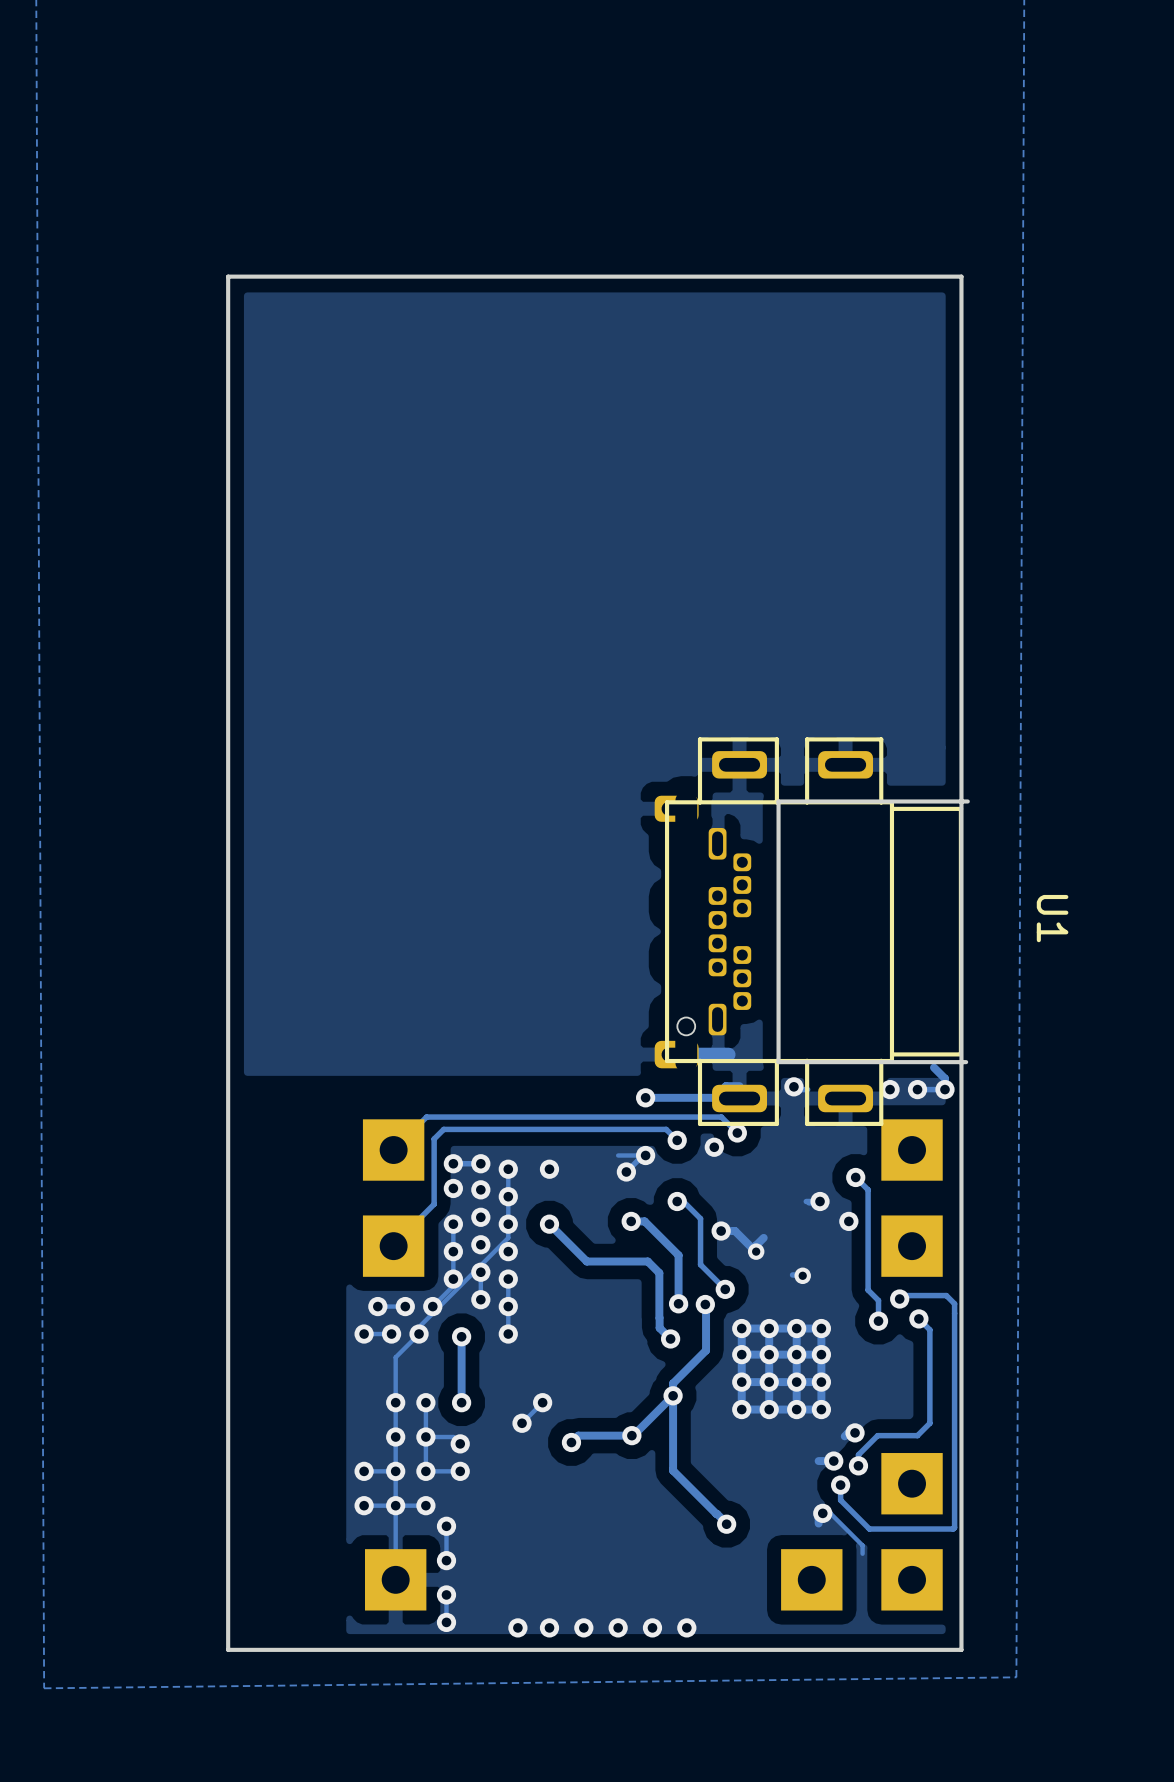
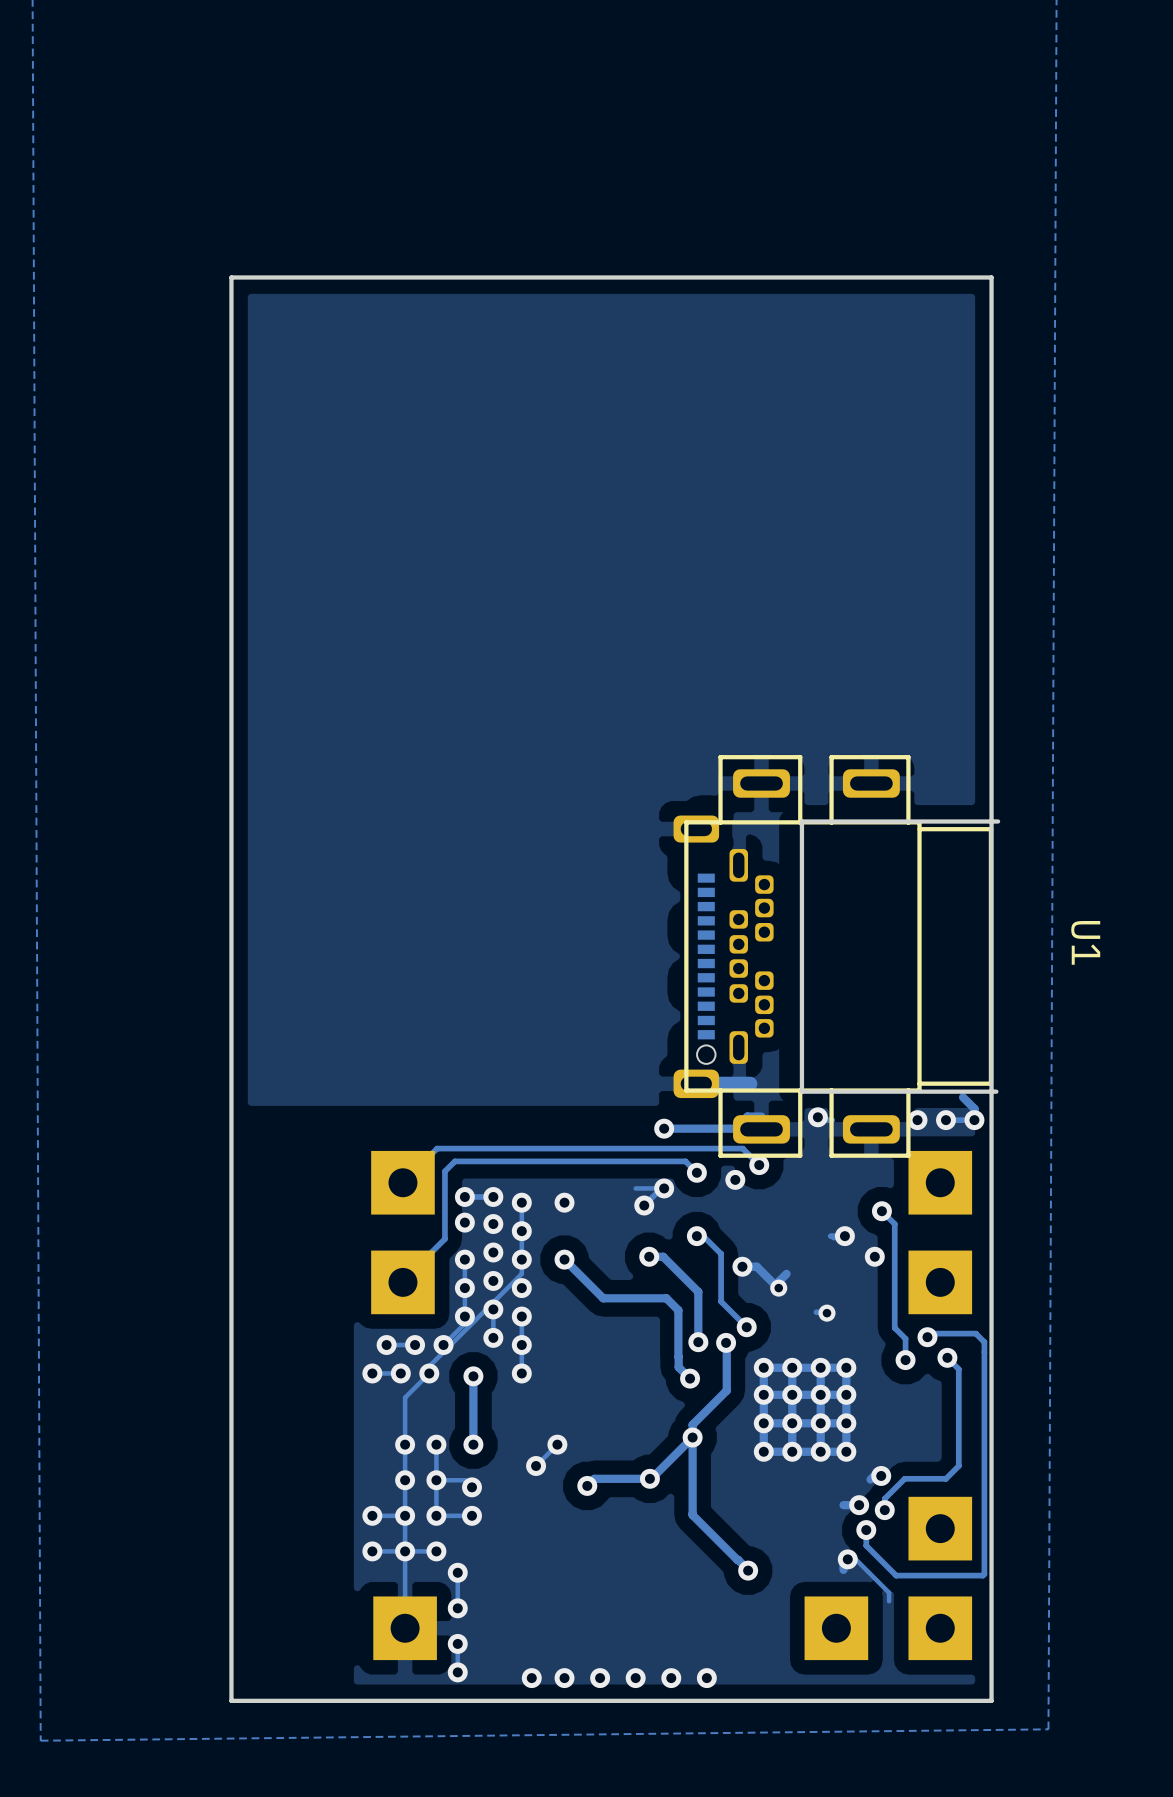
U1 footprint: [654, 737, 964, 1126] -> [673, 755, 994, 1158]

